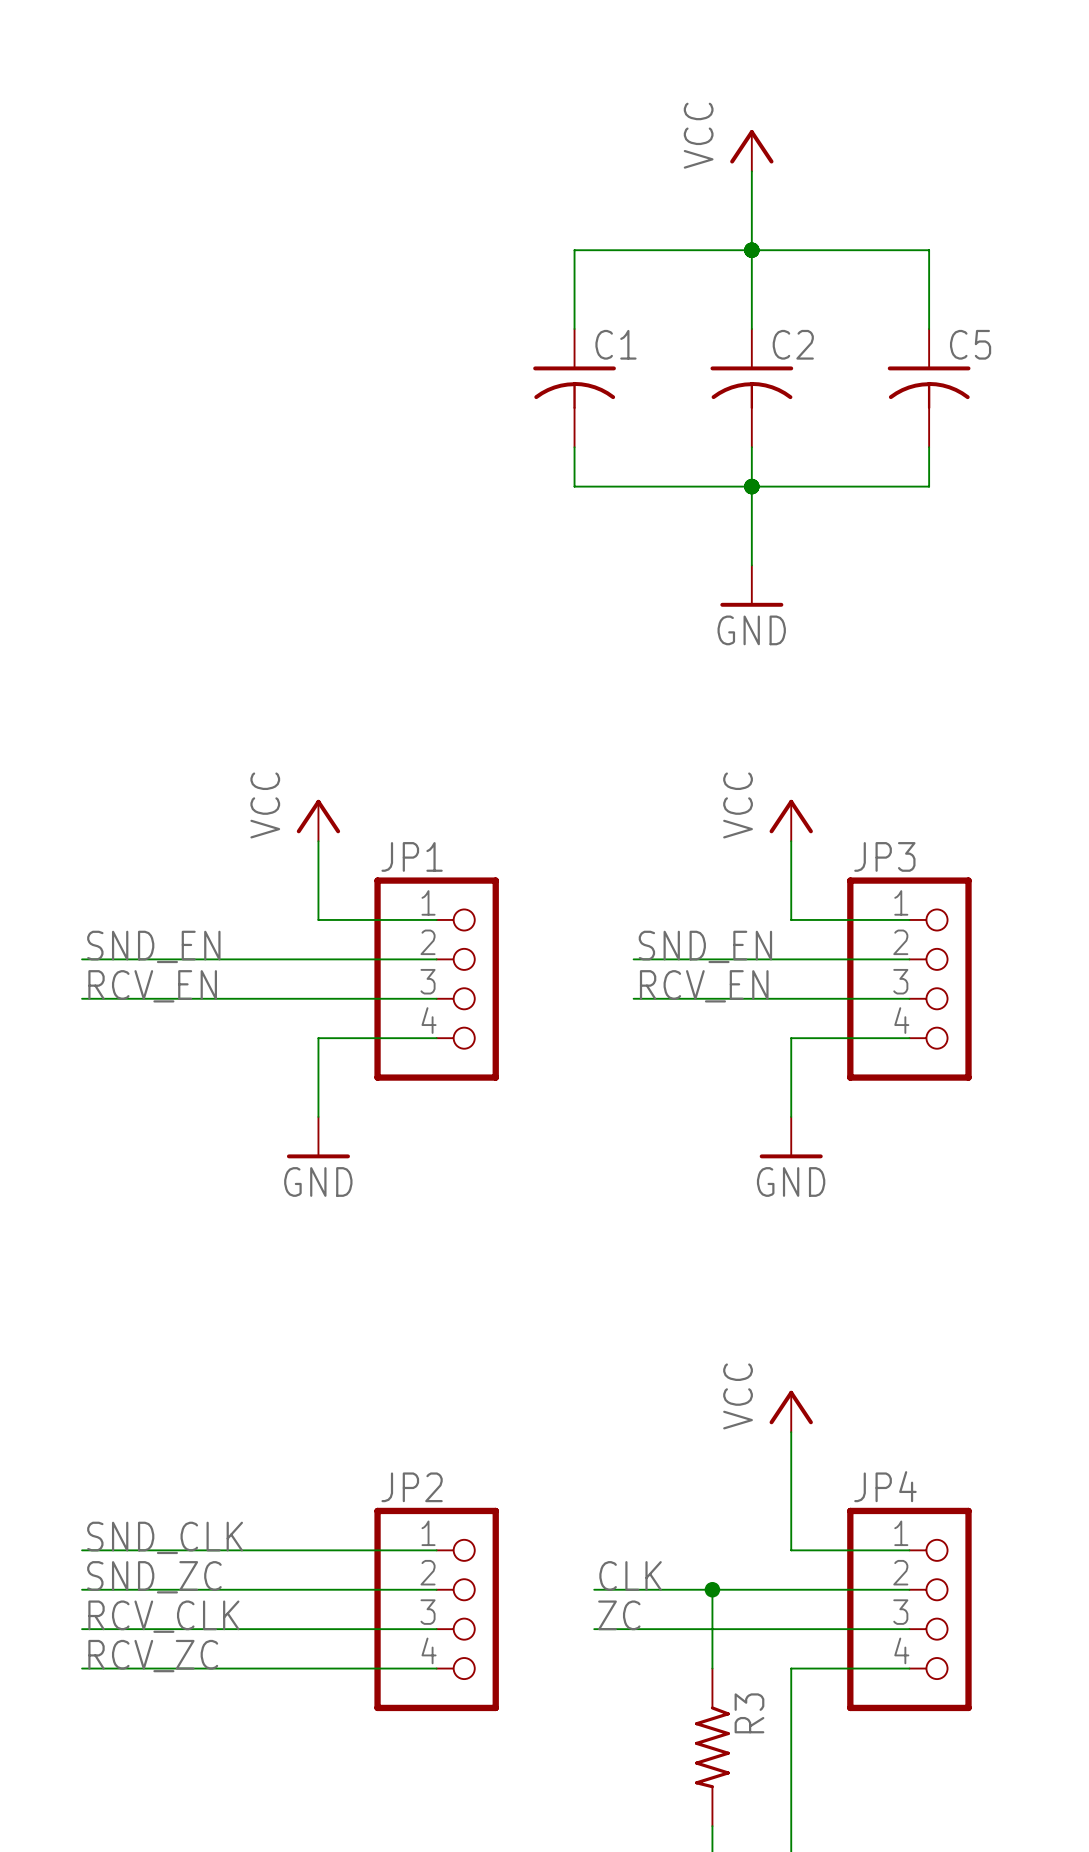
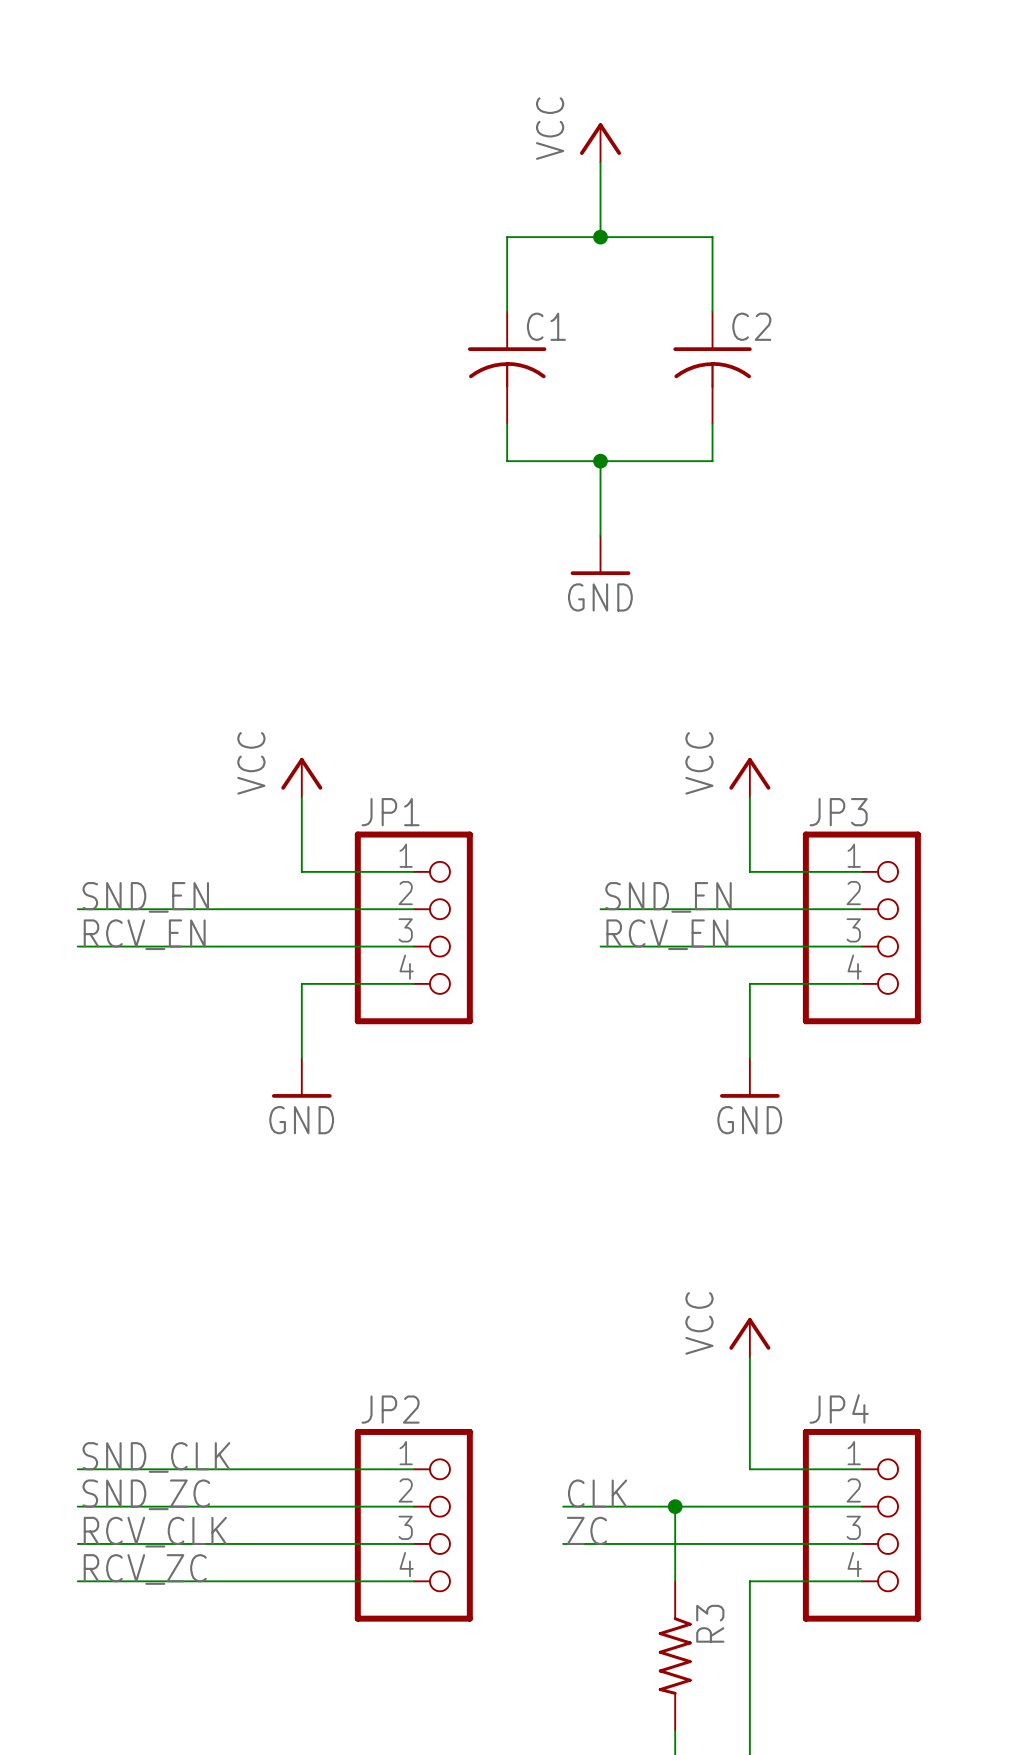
power symbol position: VCC (751, 150) -> VCC (600, 142)
wire: none -> (600, 162) (600, 237)
wire: (751, 171) (751, 250) (929, 250) (929, 329) -> none
wire: (574, 250) (574, 329) -> (544, 237) (507, 237) (507, 311)
junction: none -> (600, 237)
junction: (751, 250) -> none
C1 position: (574, 388) -> (507, 367)
C5: (929, 388) -> none
wire: (574, 447) (574, 486) -> (507, 423) (507, 461) (544, 461)
wire: (929, 447) (929, 486) (751, 486) (751, 565) -> none
wire: none -> (600, 461) (600, 535)
junction: none -> (600, 461)
junction: (751, 486) -> none
power symbol position: GND (751, 586) -> GND (600, 555)

